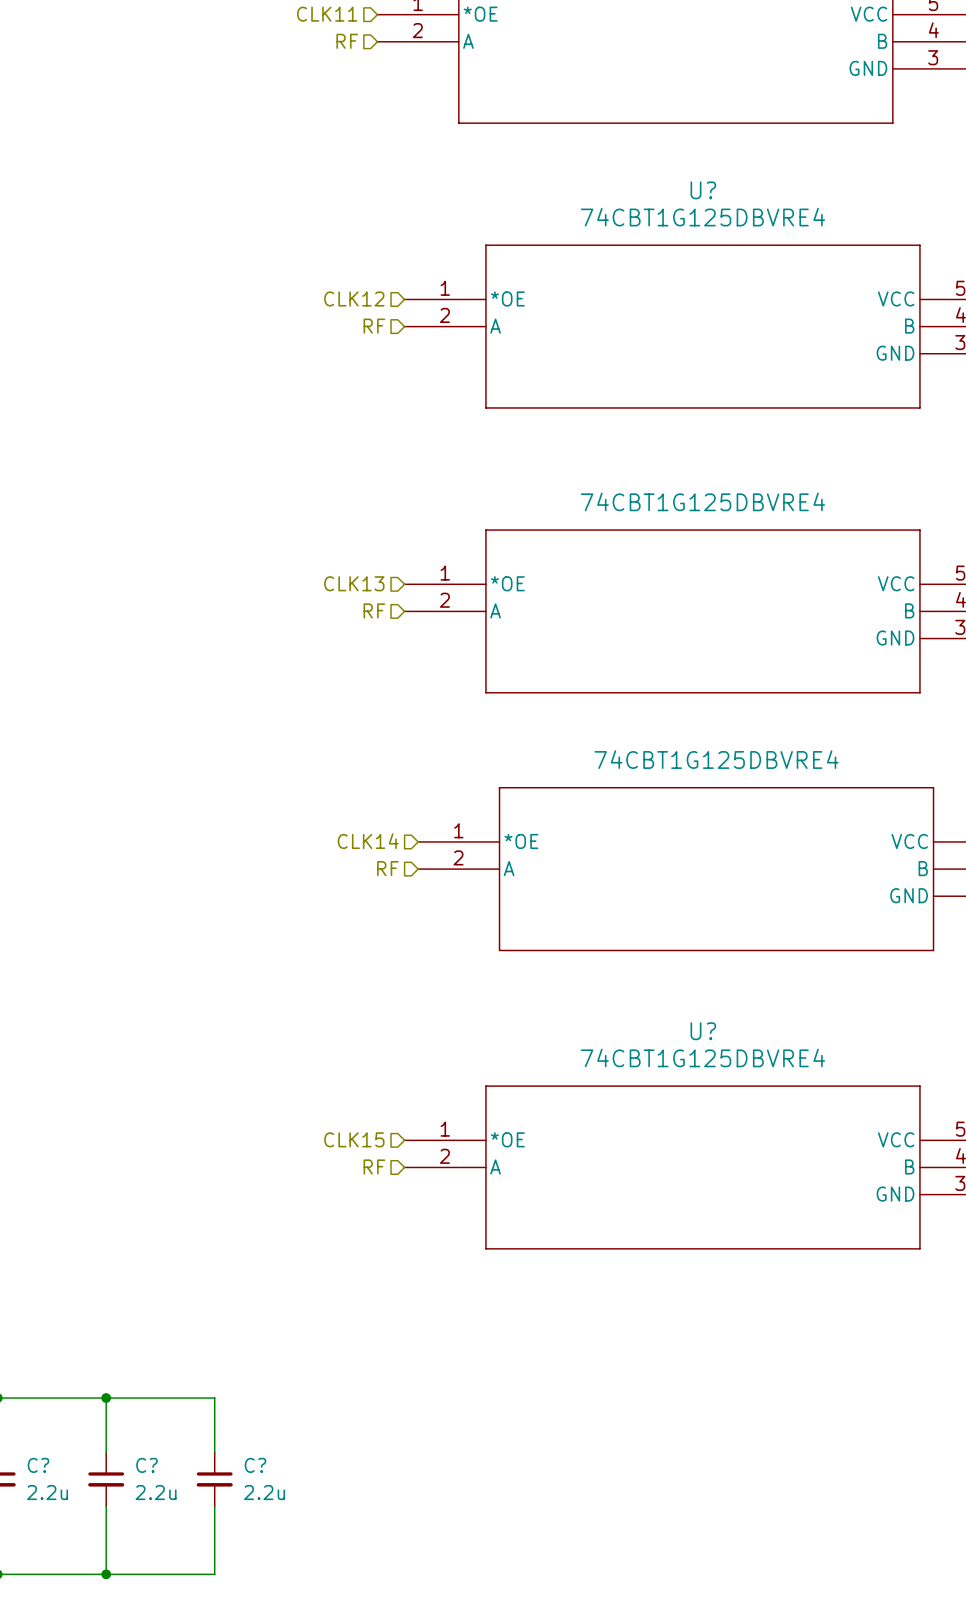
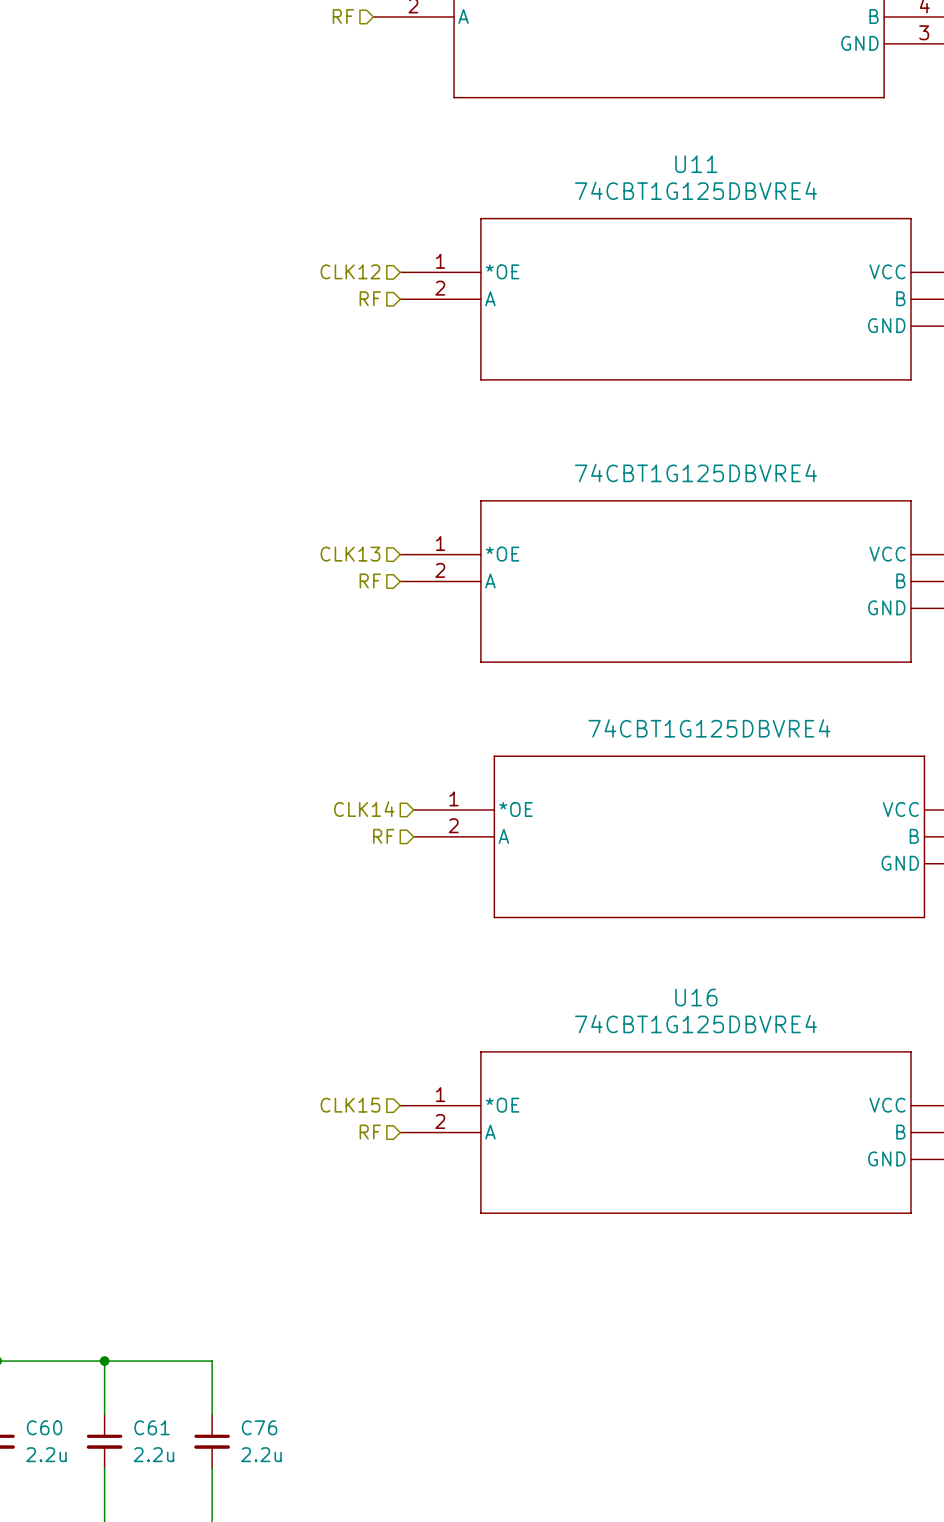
U? name: U? (703, 190) -> U11 (696, 164)
U? name: U? (703, 1031) -> U16 (696, 997)
C? name: C? (38, 1465) -> C60 (44, 1427)
C? name: C? (147, 1465) -> C61 (152, 1427)
C? name: C? (255, 1465) -> C76 (259, 1427)

